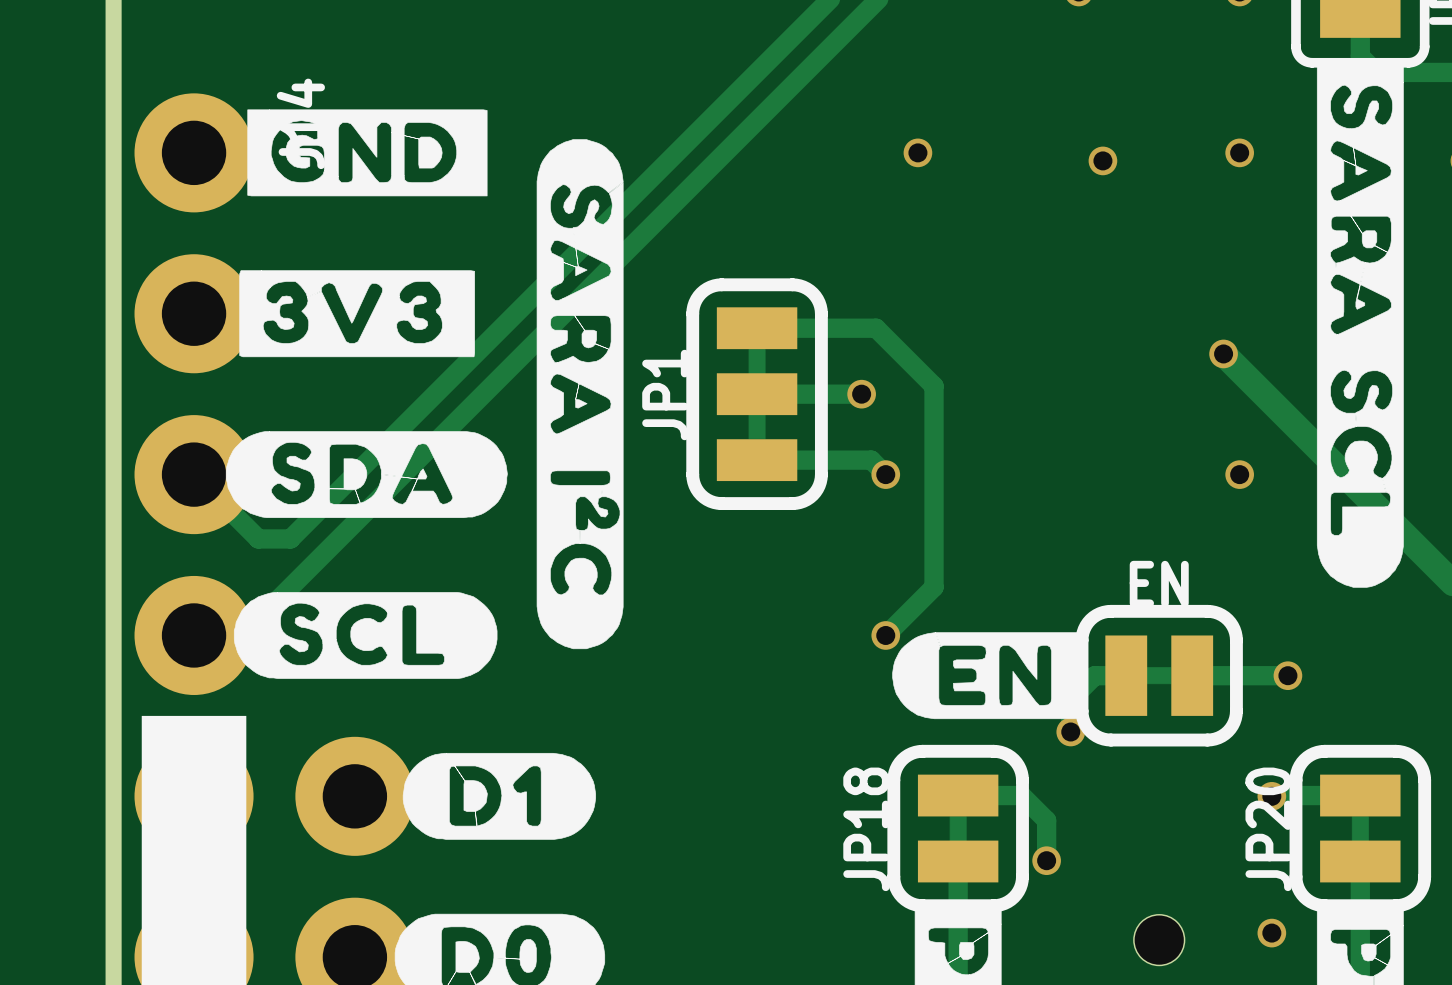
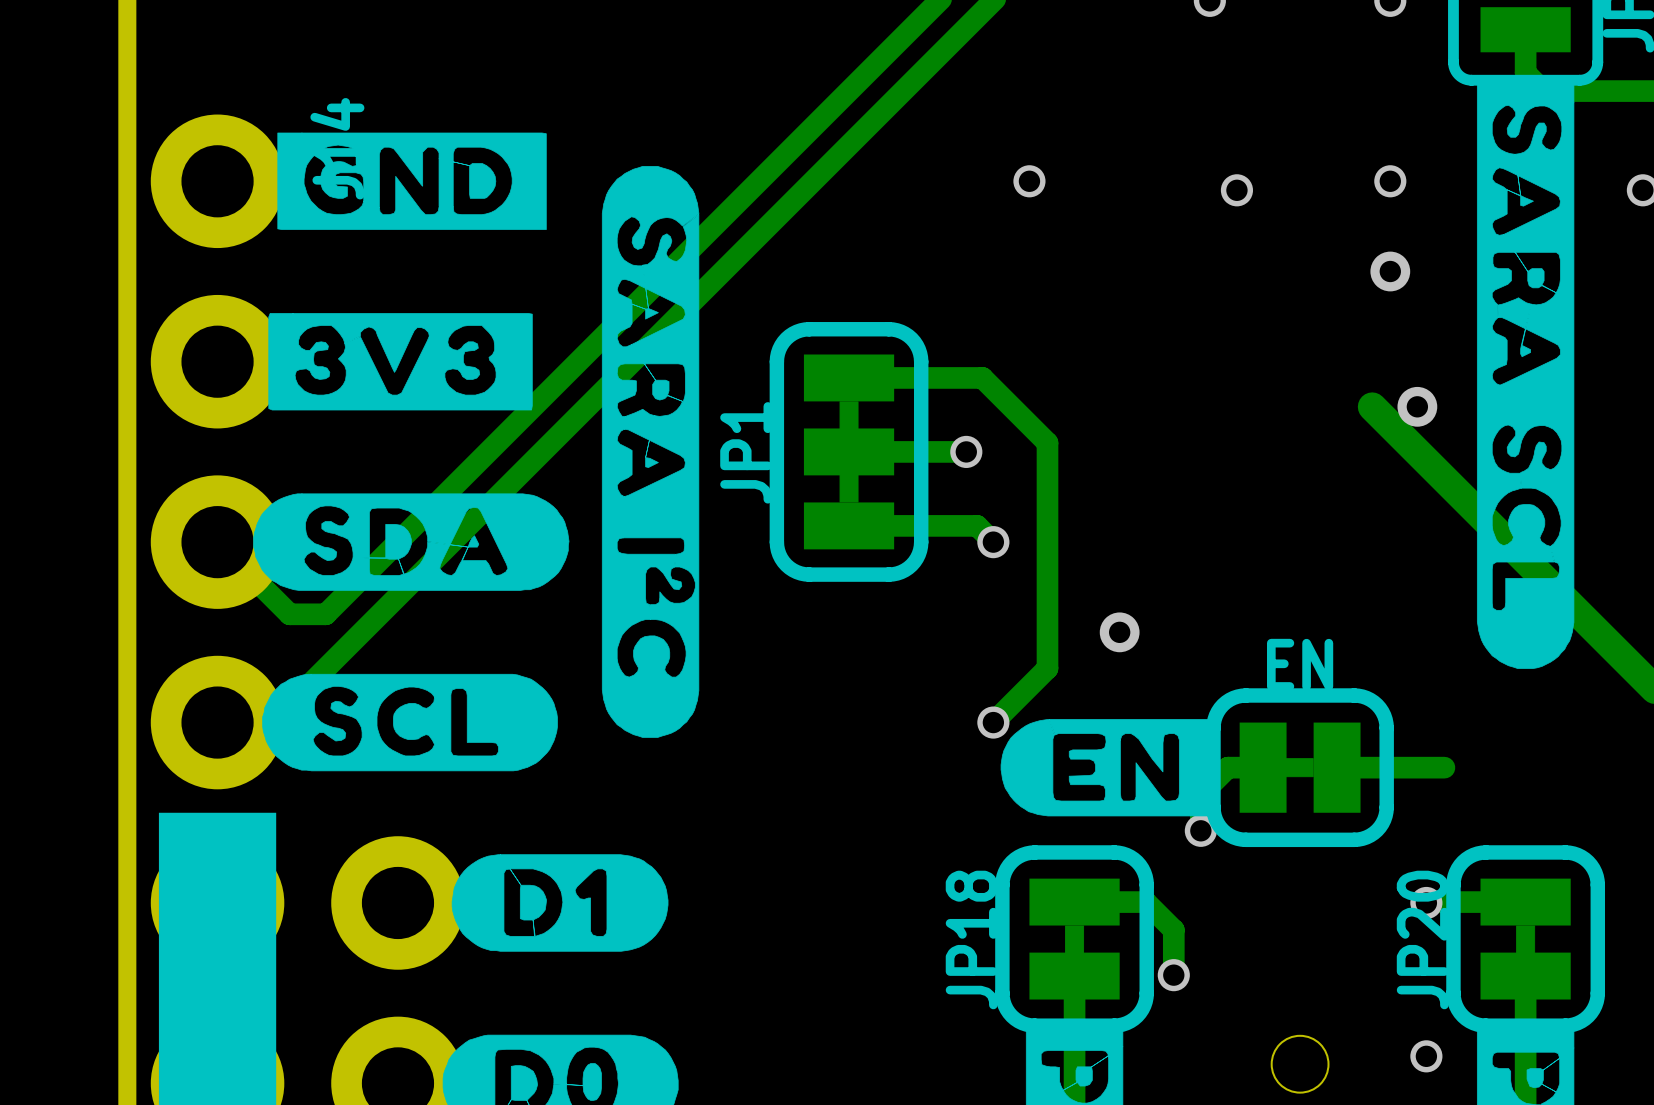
via: none -> (1390, 271)
via: (1223, 353) -> none
via: none -> (1417, 406)
via: (1239, 474) -> none
via: none -> (1119, 632)
via: (1287, 675) -> none

